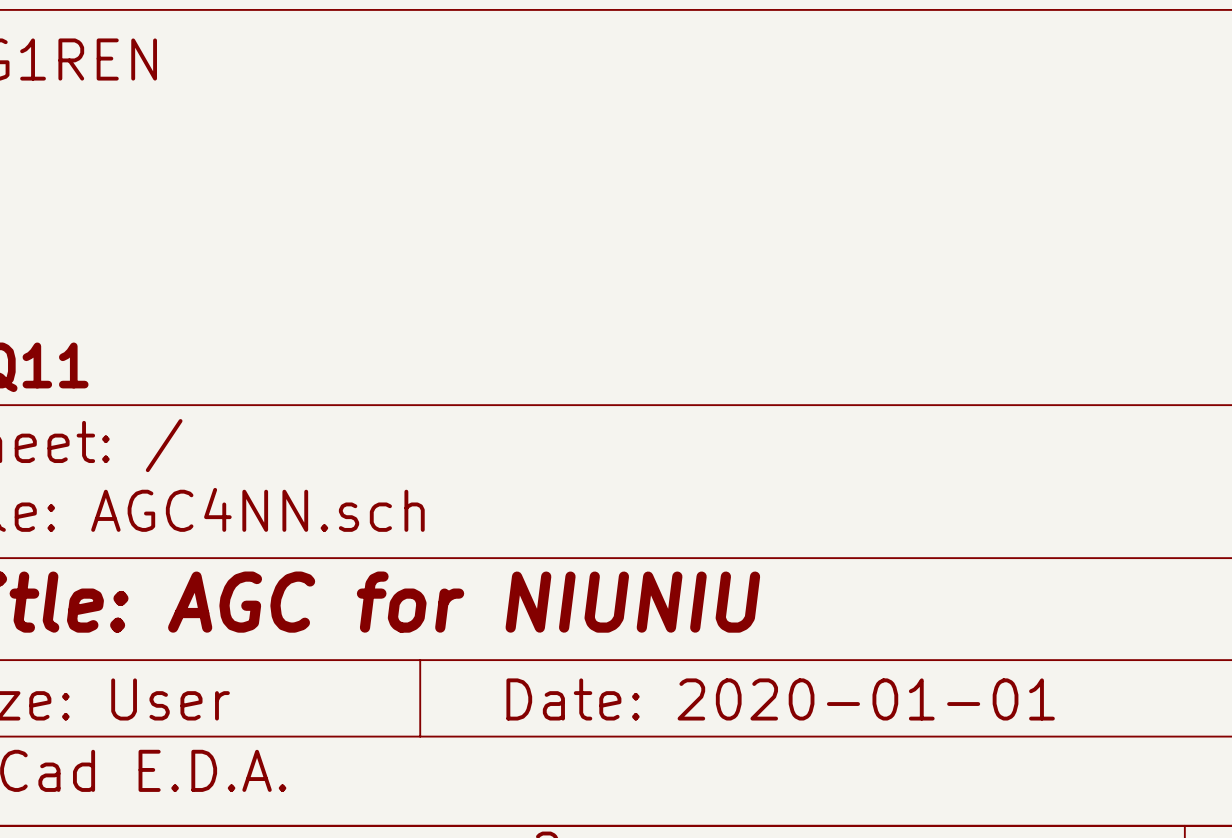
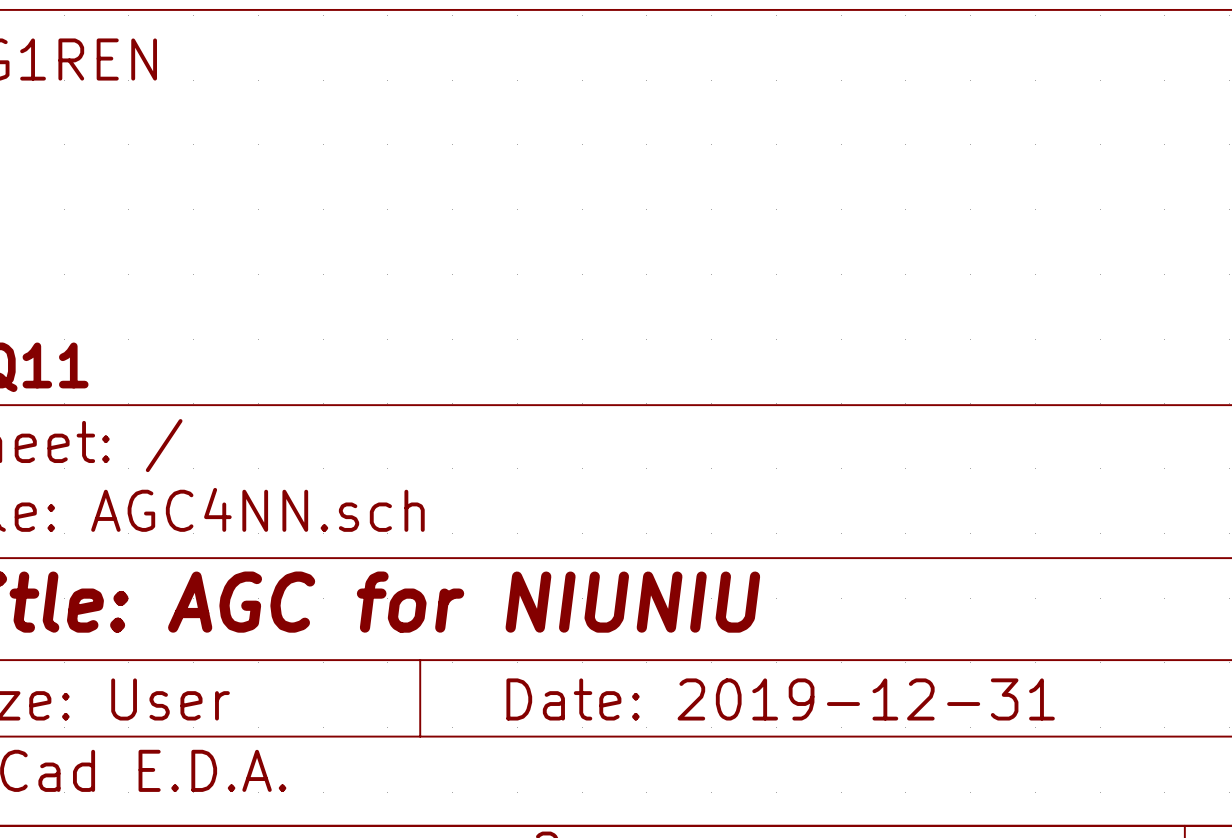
title block: Date: 2020-01-01 (780, 699) -> Date: 2019-12-31 (780, 699)

